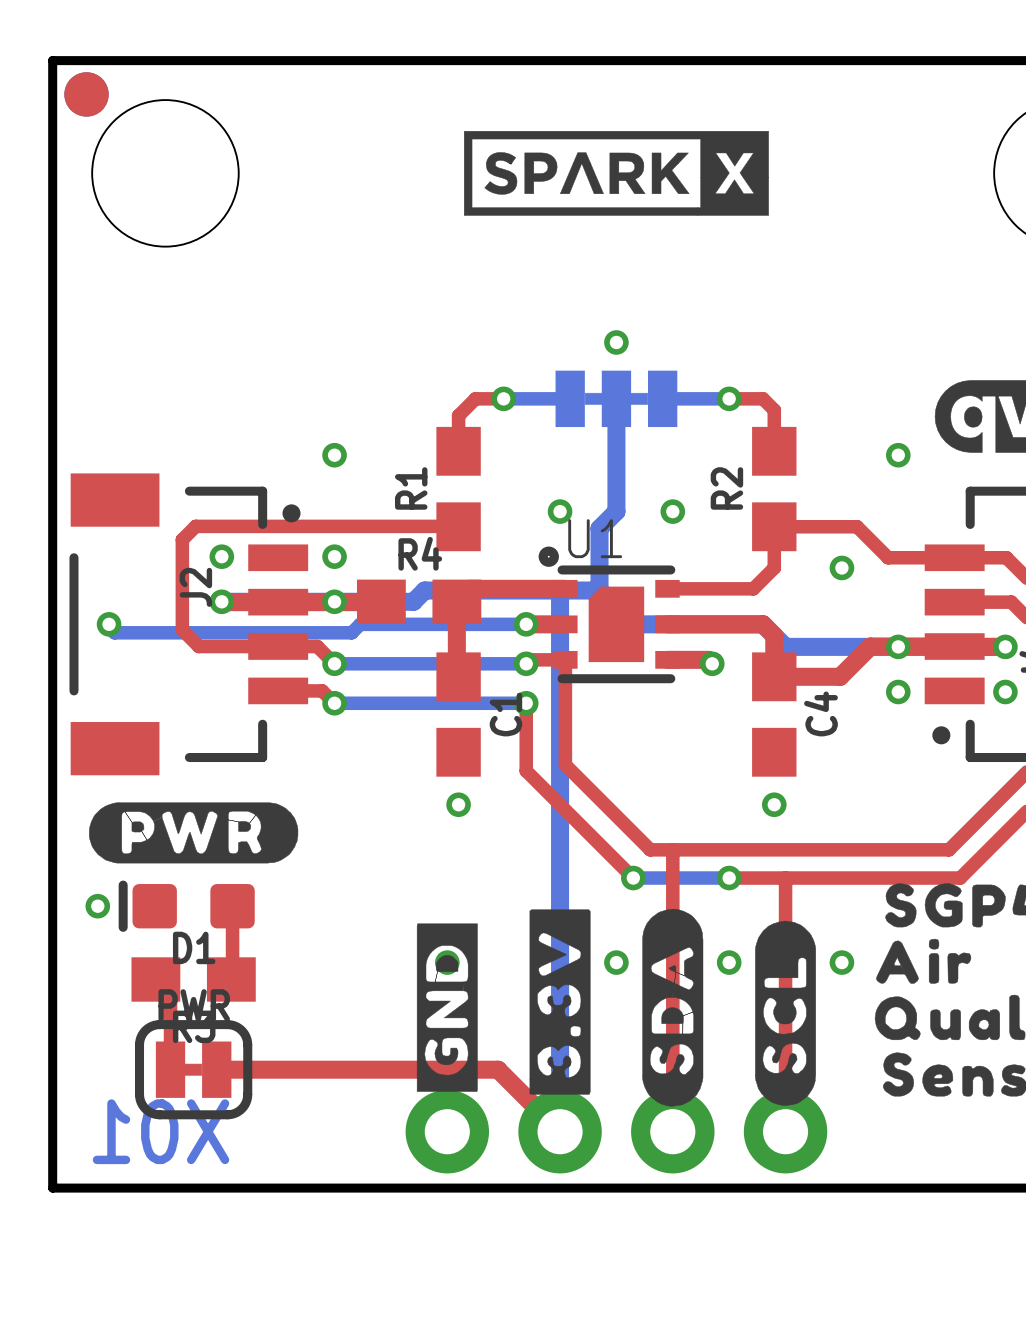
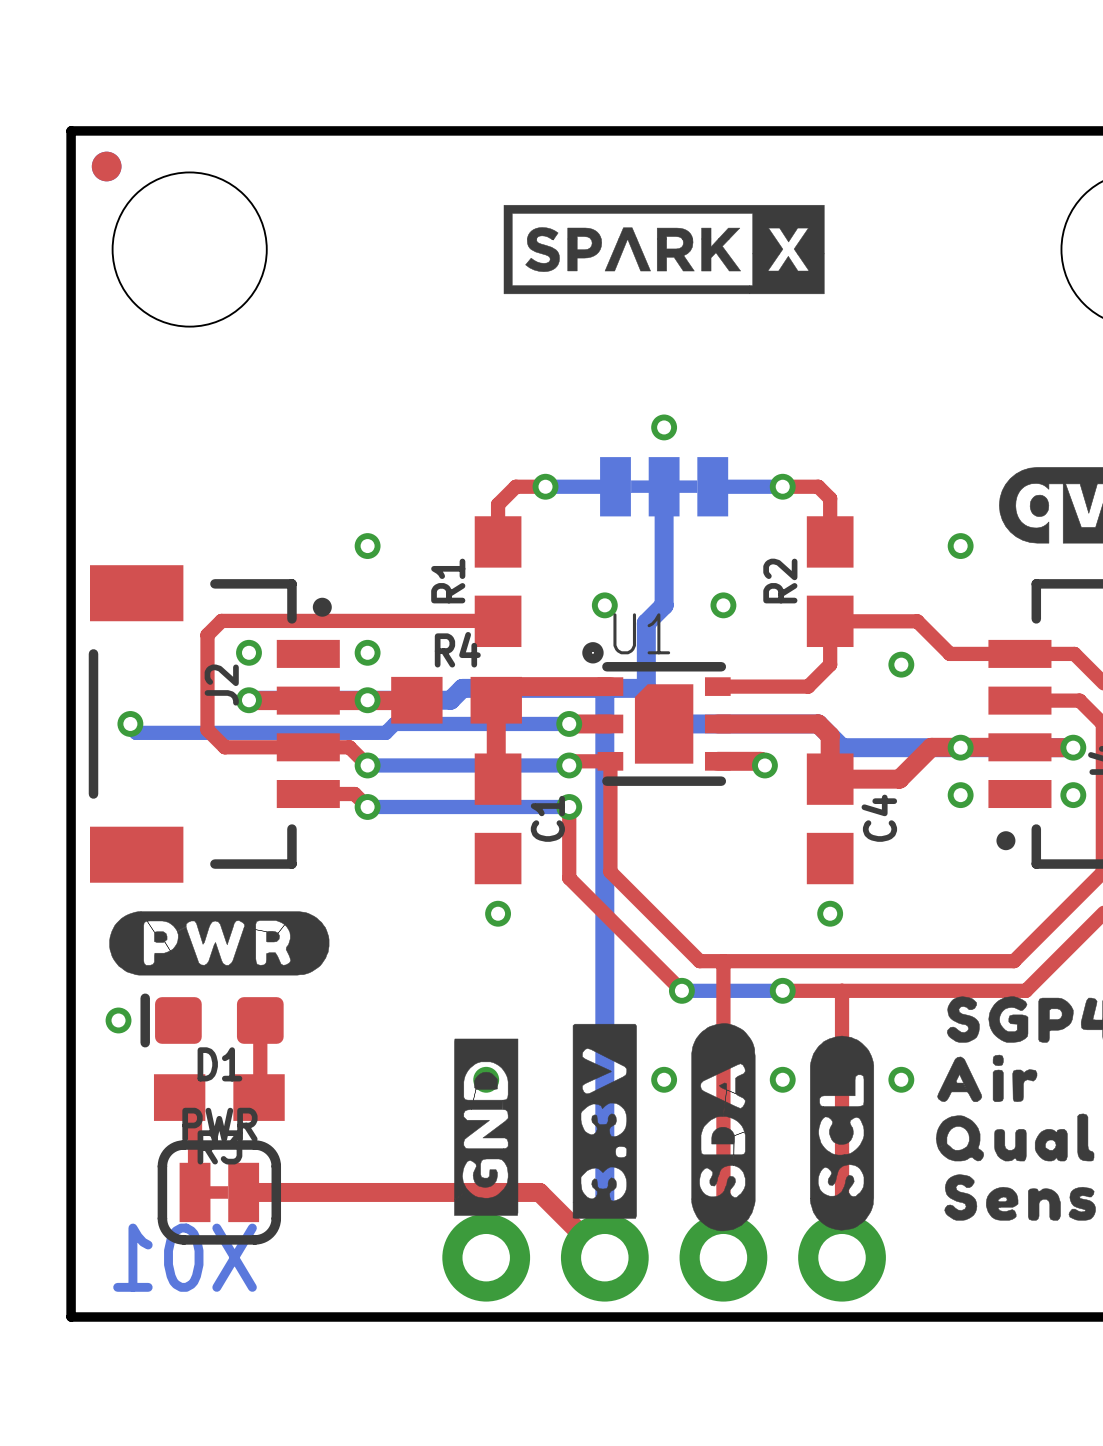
part: (86, 94) -> none
part: none -> (106, 166)

